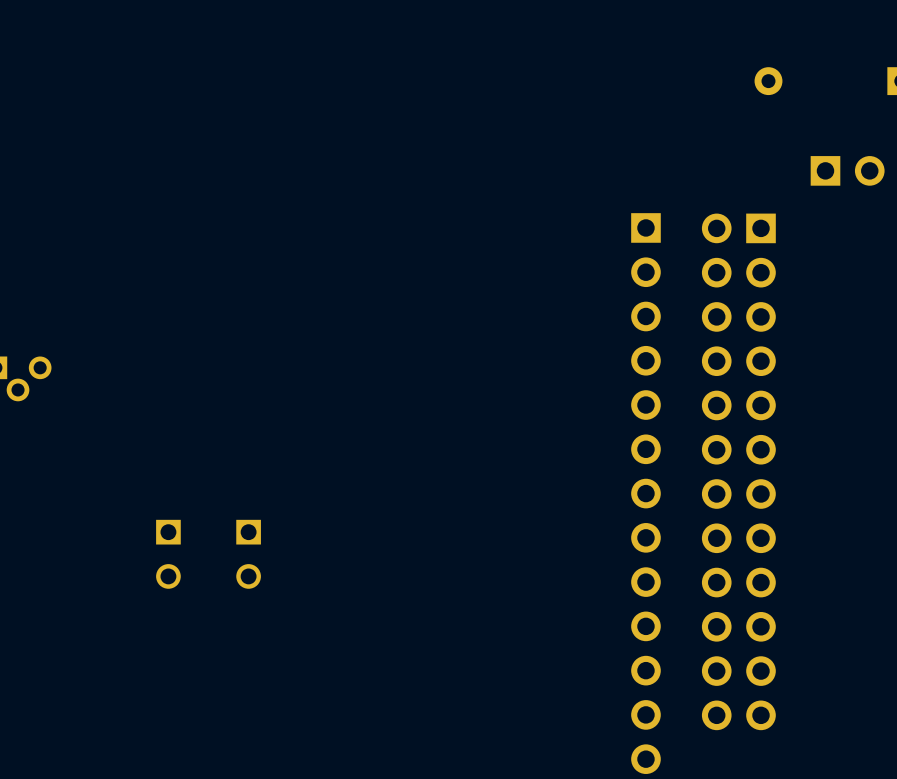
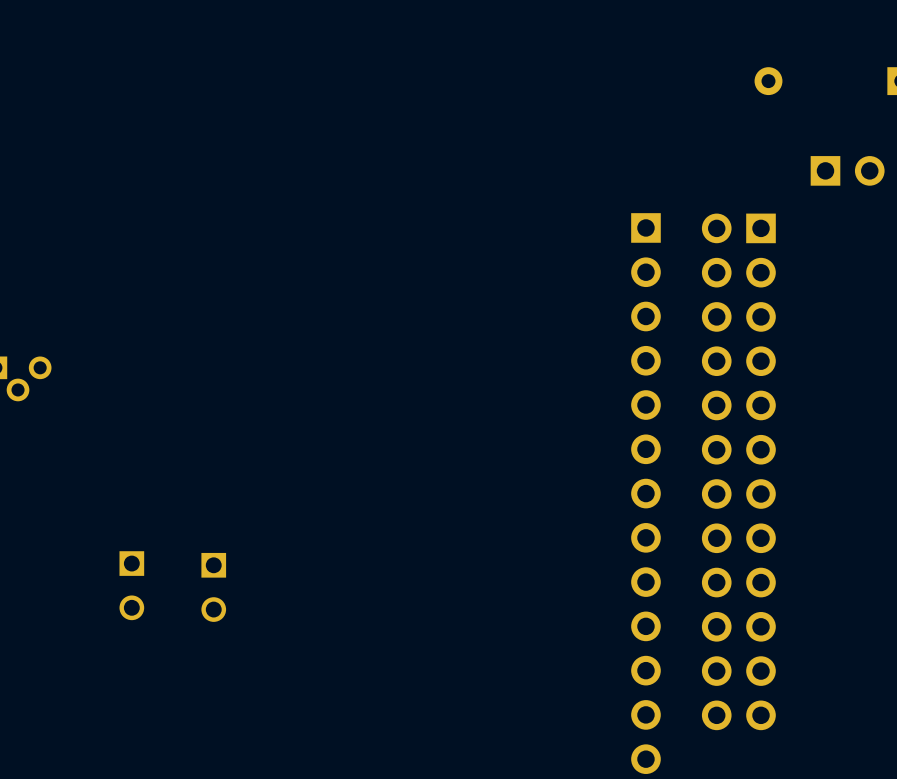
part: (168, 554) -> none
part: (248, 554) -> none
part: none -> (131, 585)
part: none -> (213, 587)

